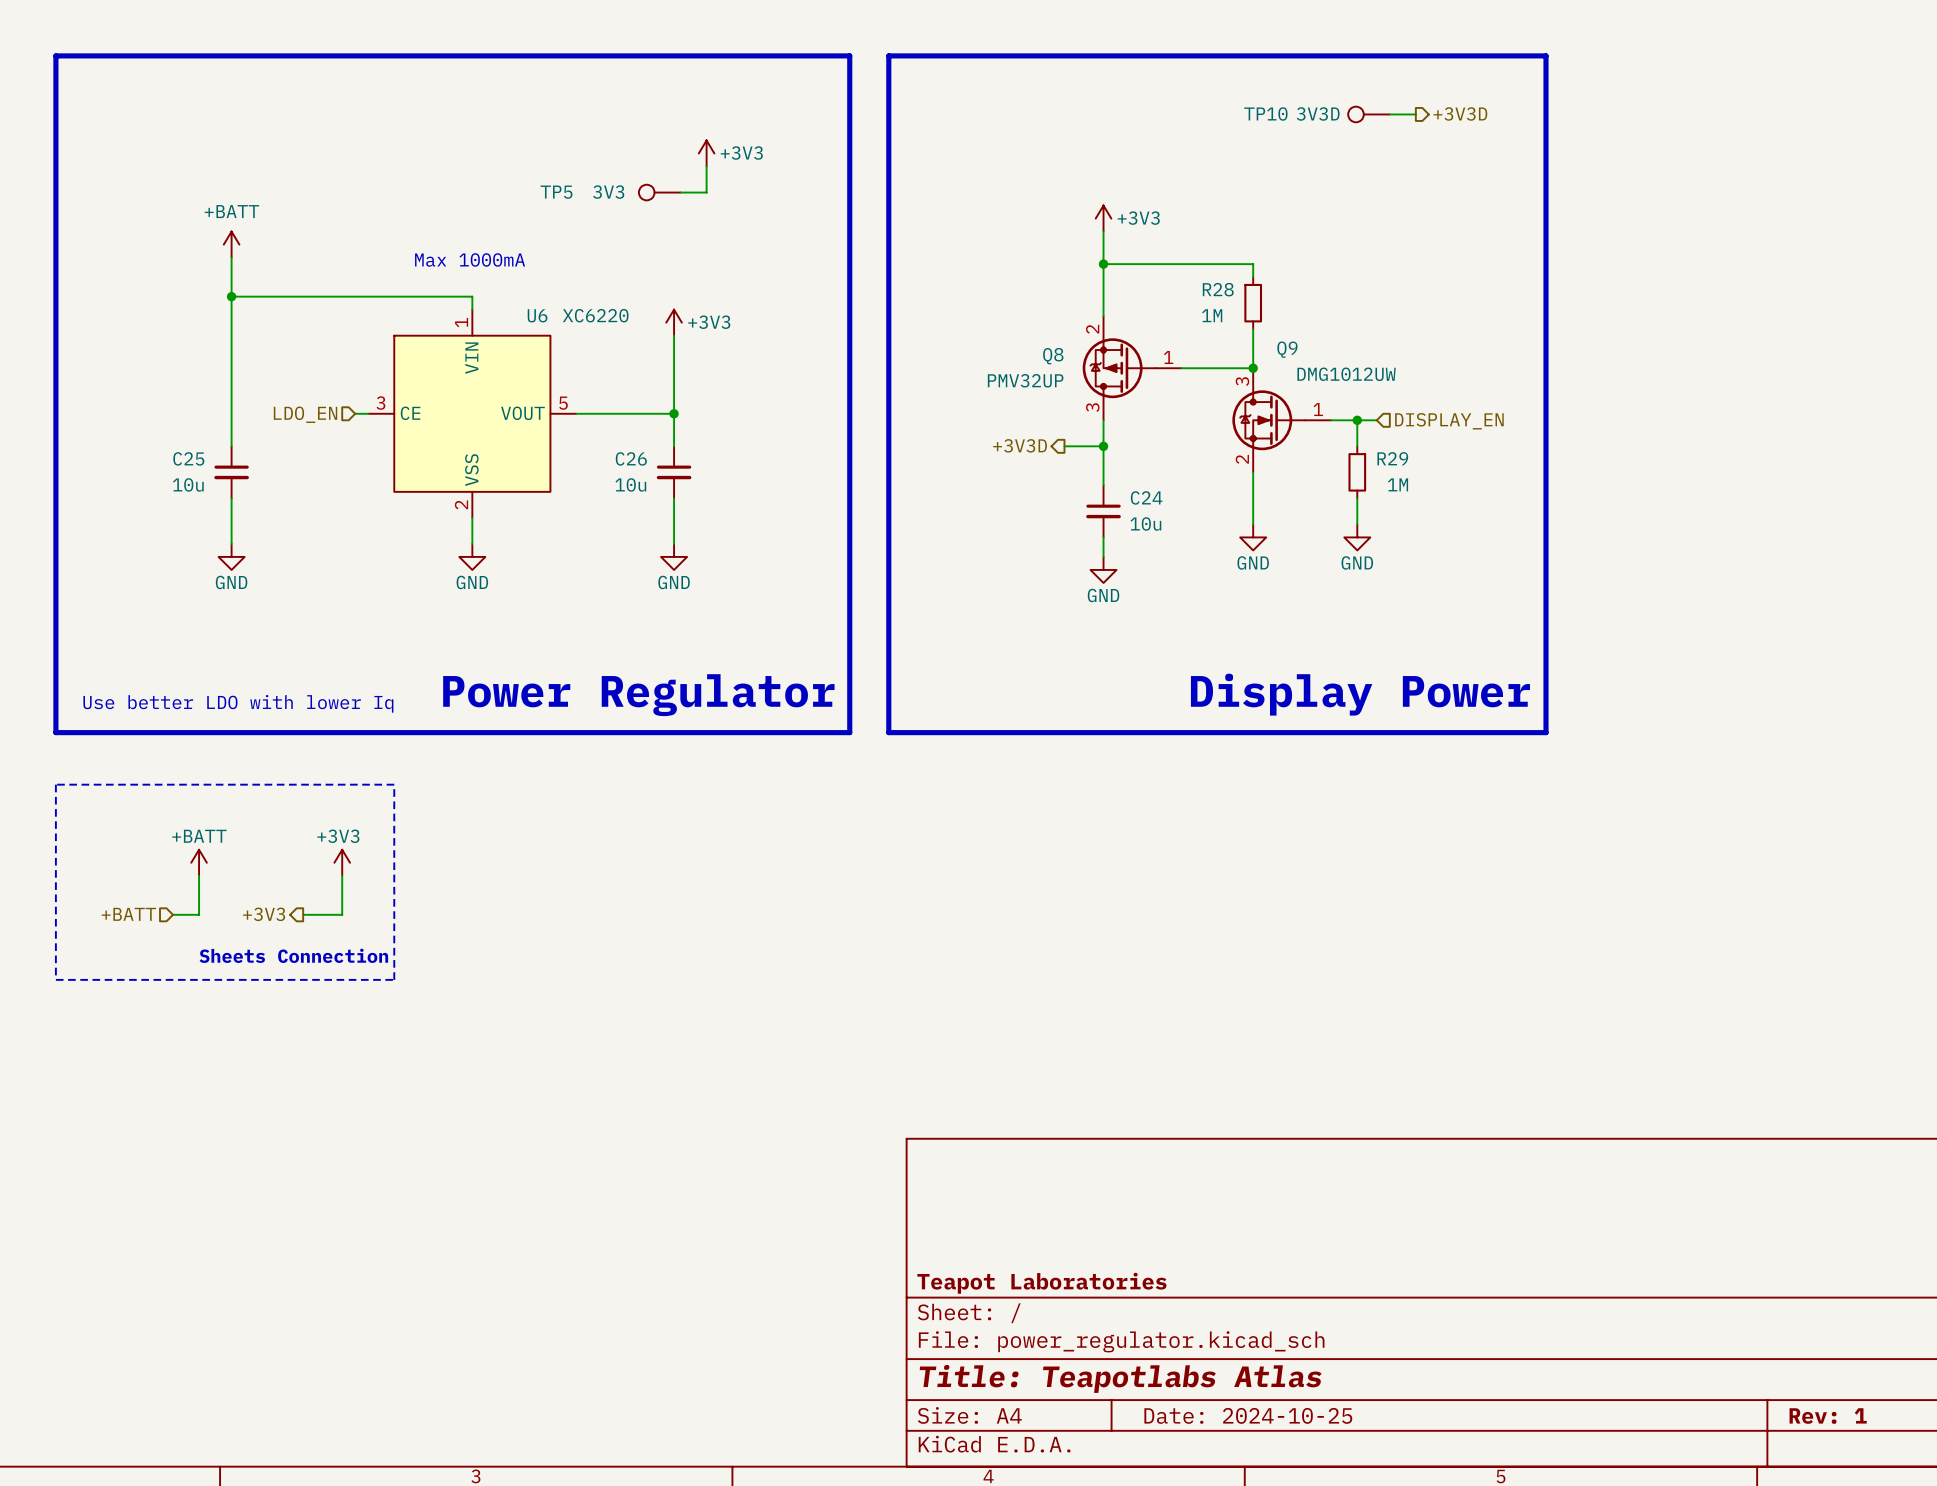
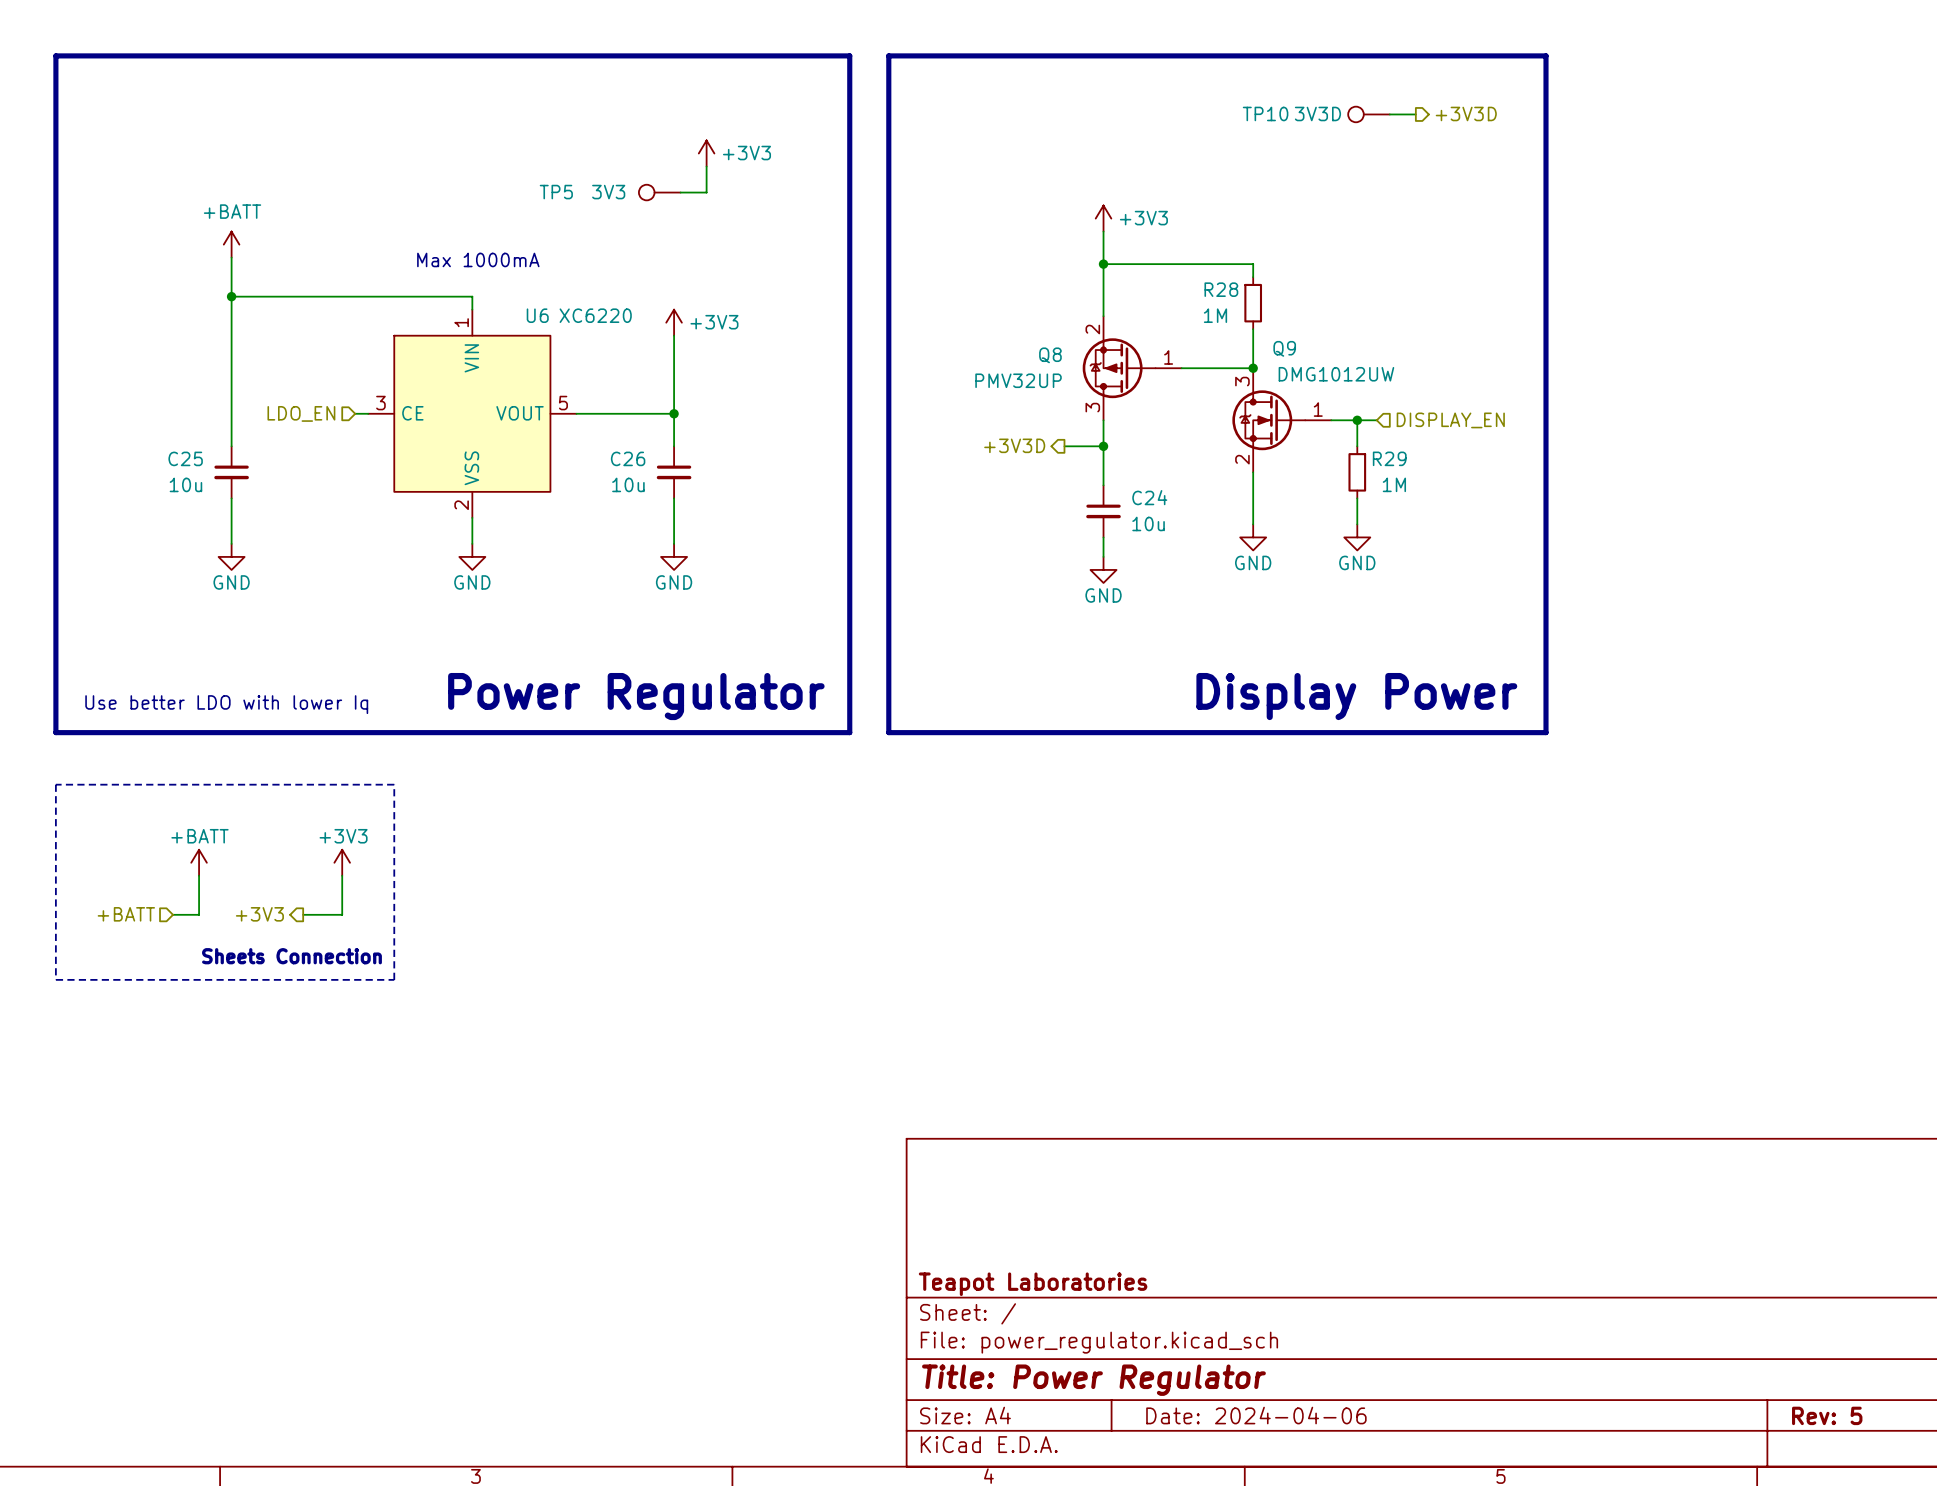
title block: Title: Teapotlabs Atlas (1120, 1378) -> Title: Power Regulator (1093, 1380)
title block: Date: 2024-10-25 (1248, 1415) -> Date: 2024-04-06 (1256, 1415)
title block: Rev: 1 (1828, 1416) -> Rev: 5 (1827, 1415)

